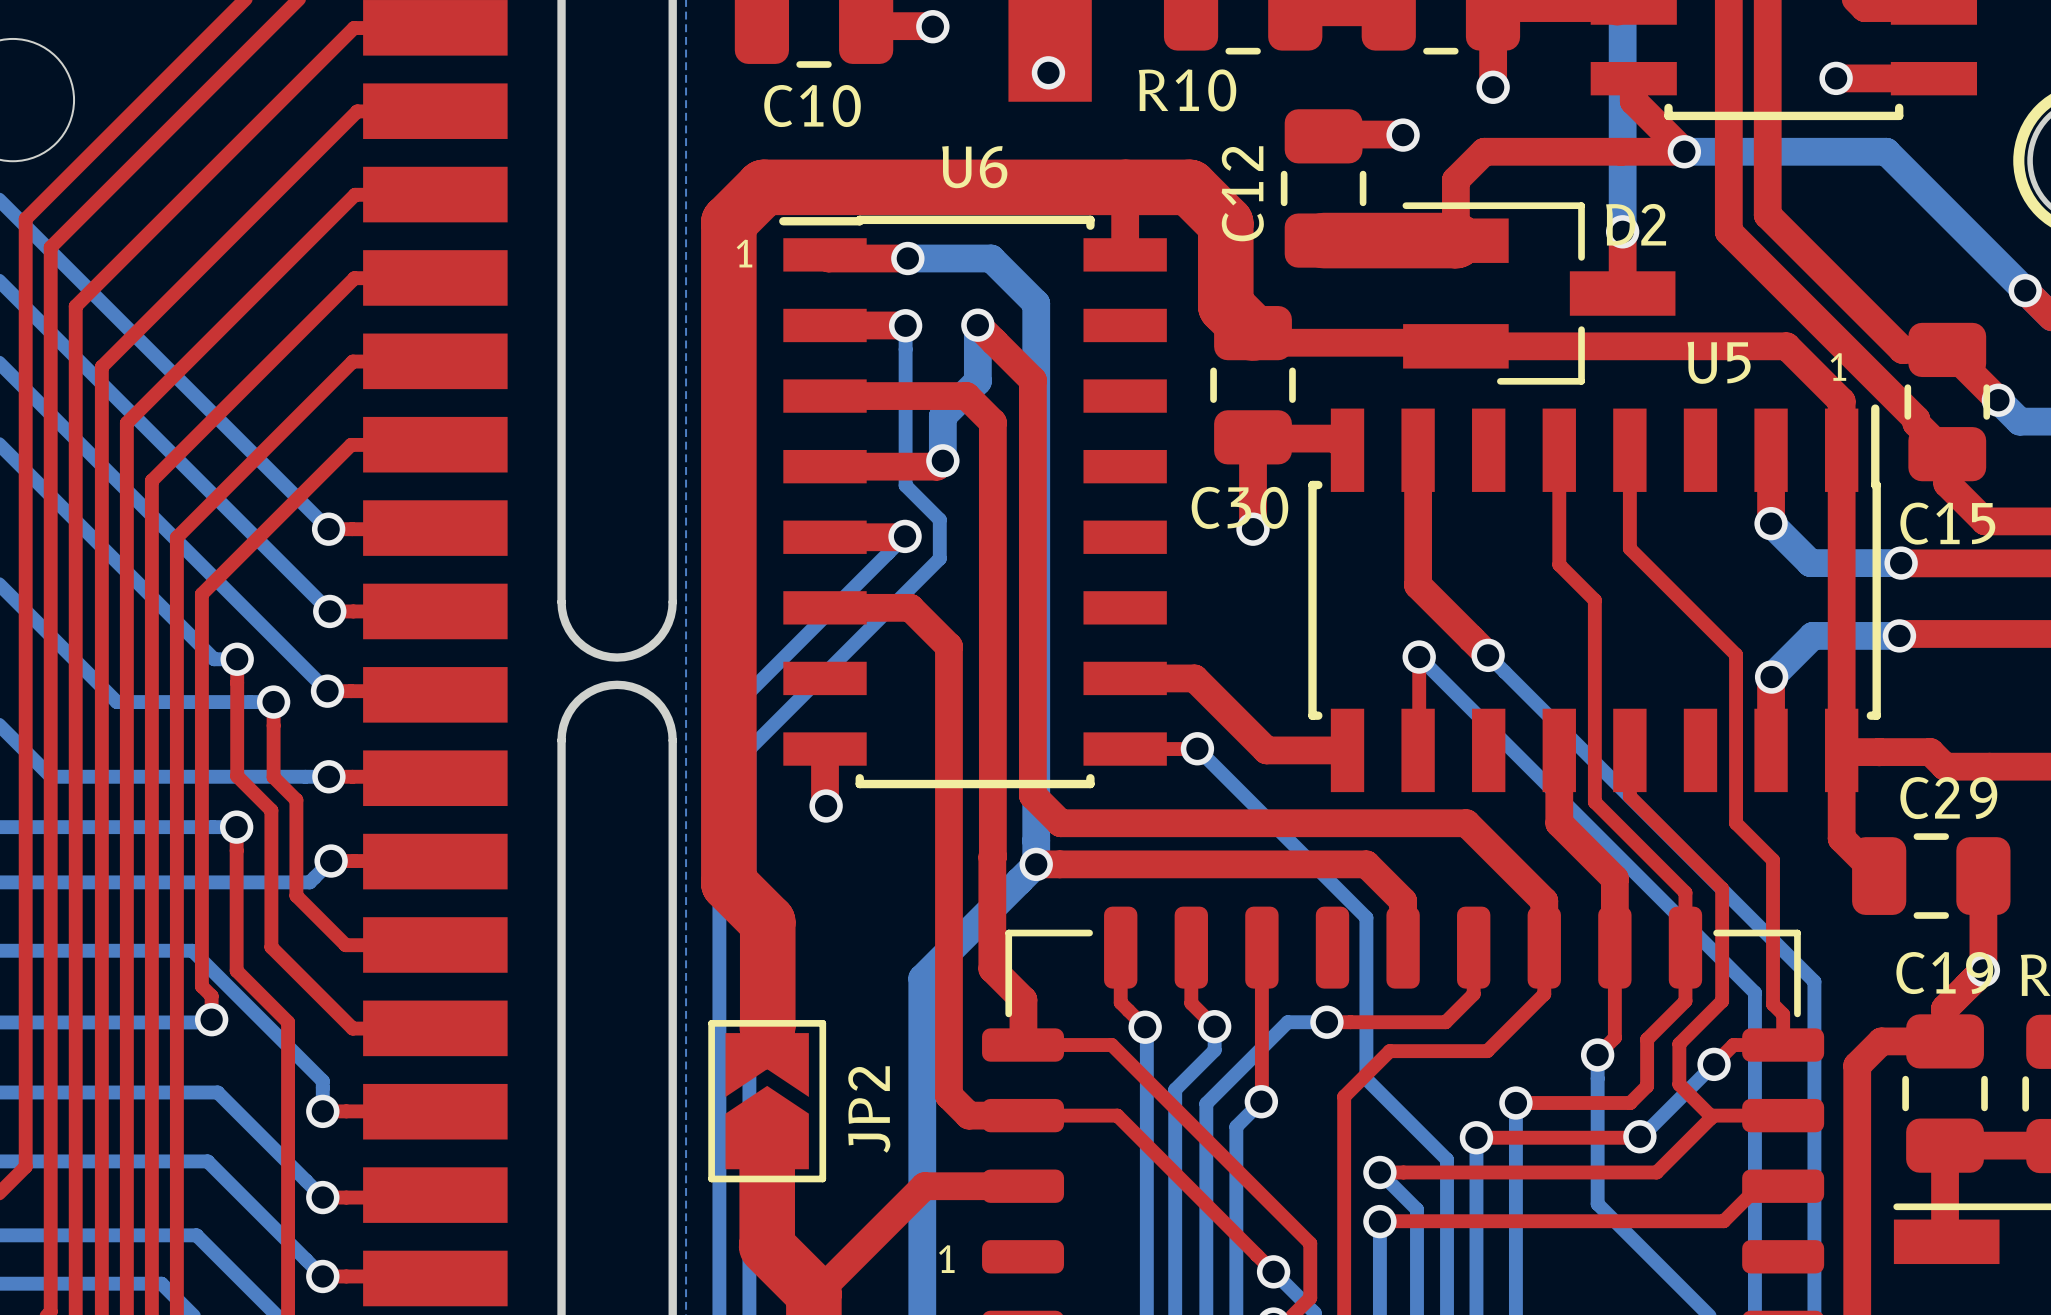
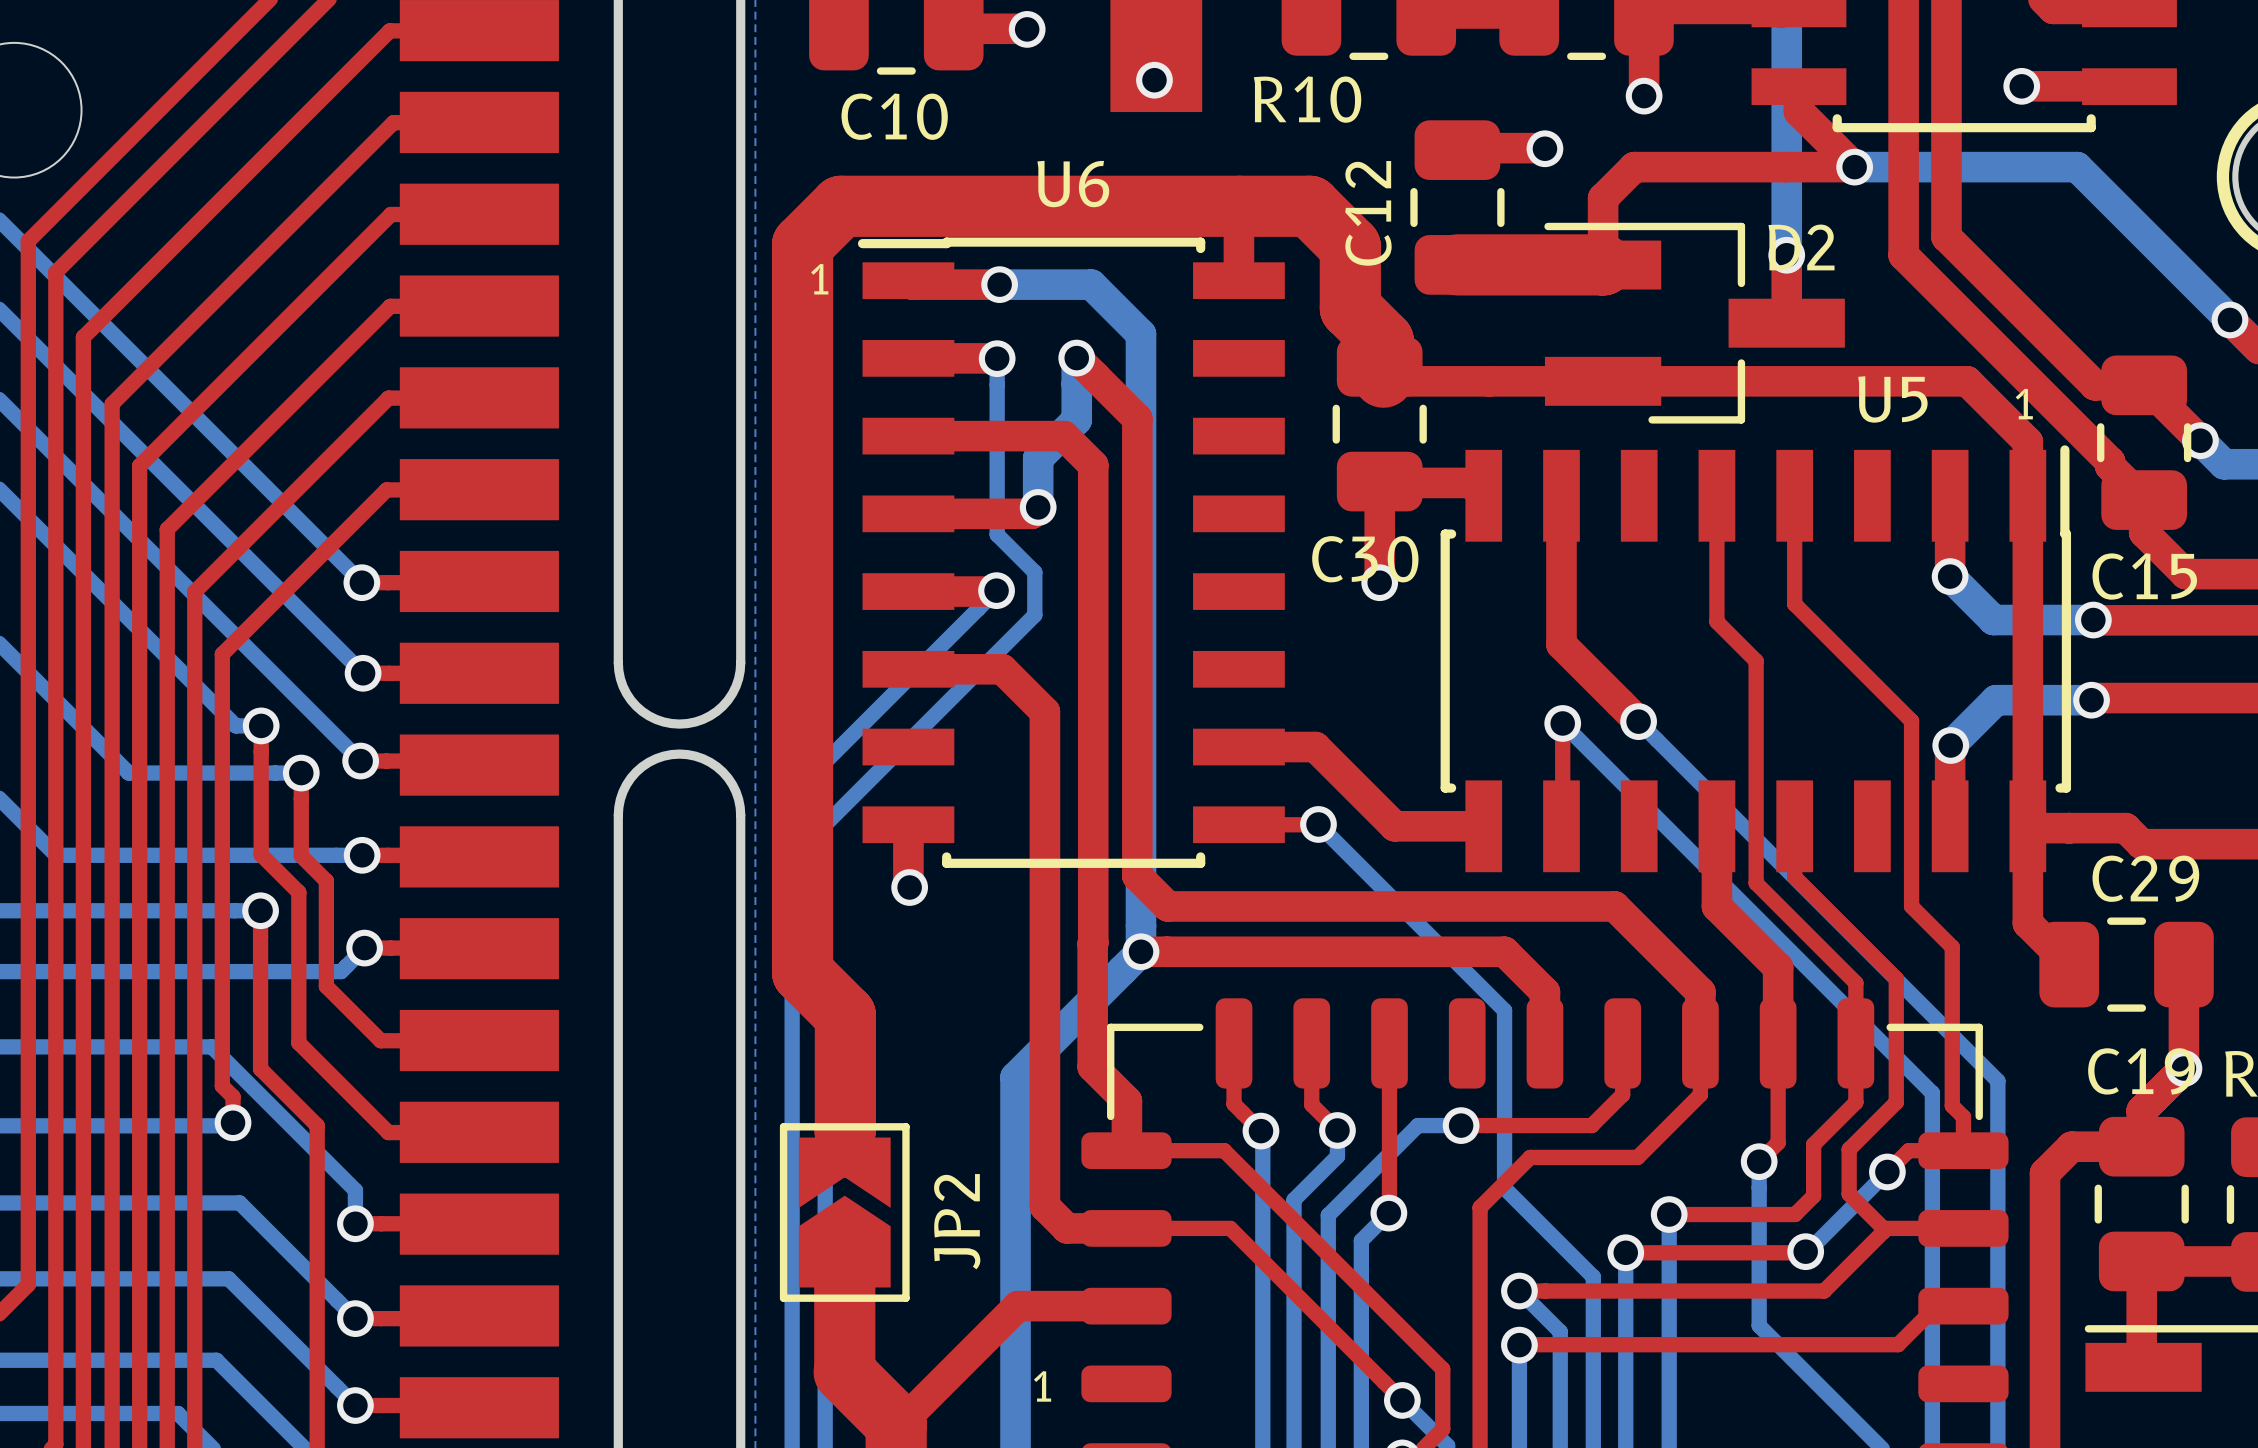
top track: (1225, 223) (1225, 305) (1262, 342) (1452, 342) (1455, 346) -> (1350, 246) (1350, 308) (1383, 341) (1383, 377) (1387, 381) (1603, 381)

